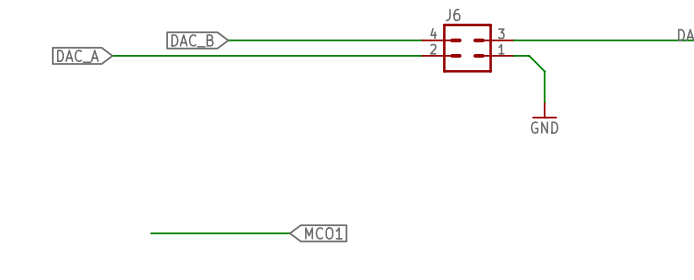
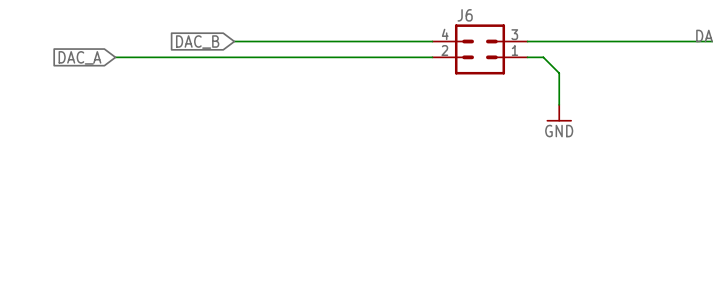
wire: (151, 233) (289, 233) -> none
global label: MCO1 (323, 233) -> none

